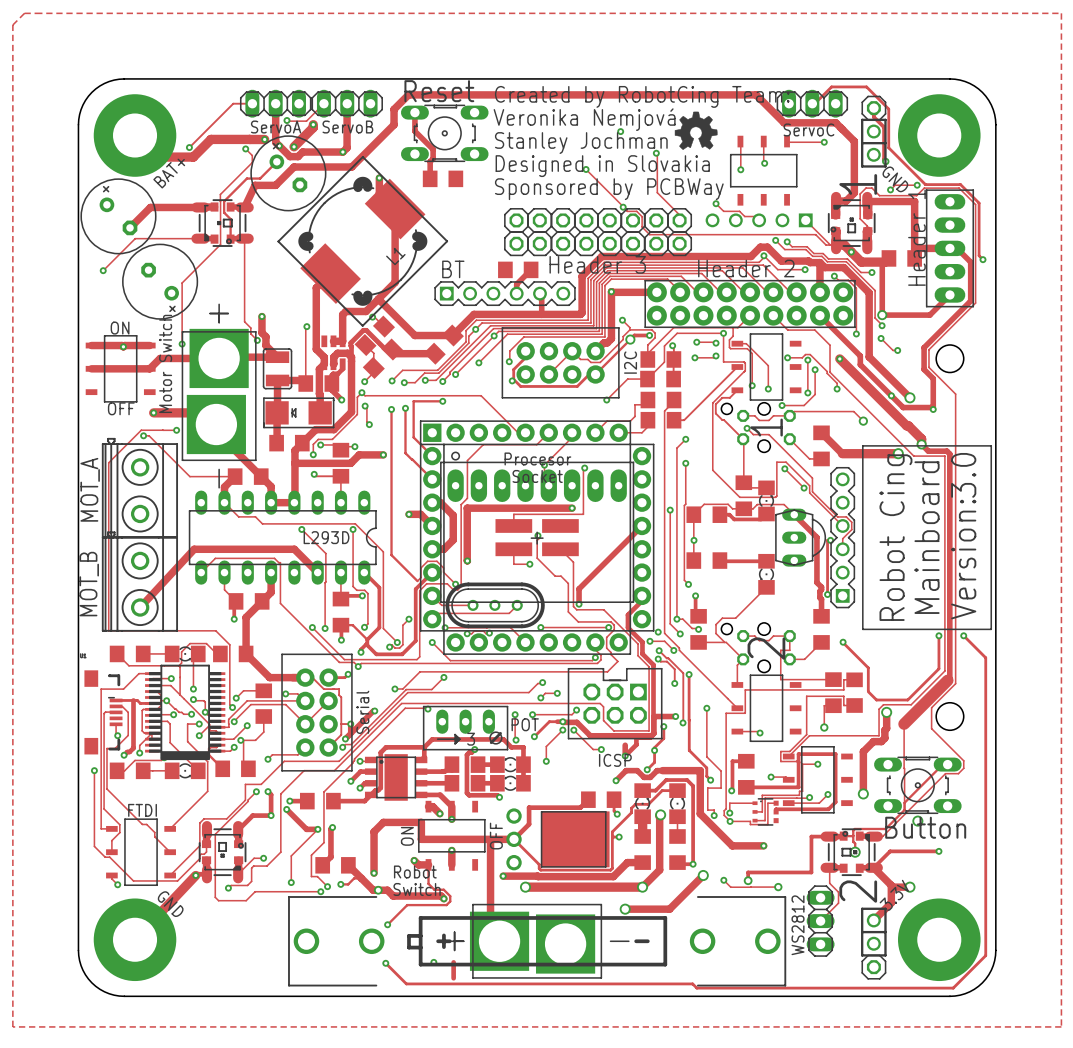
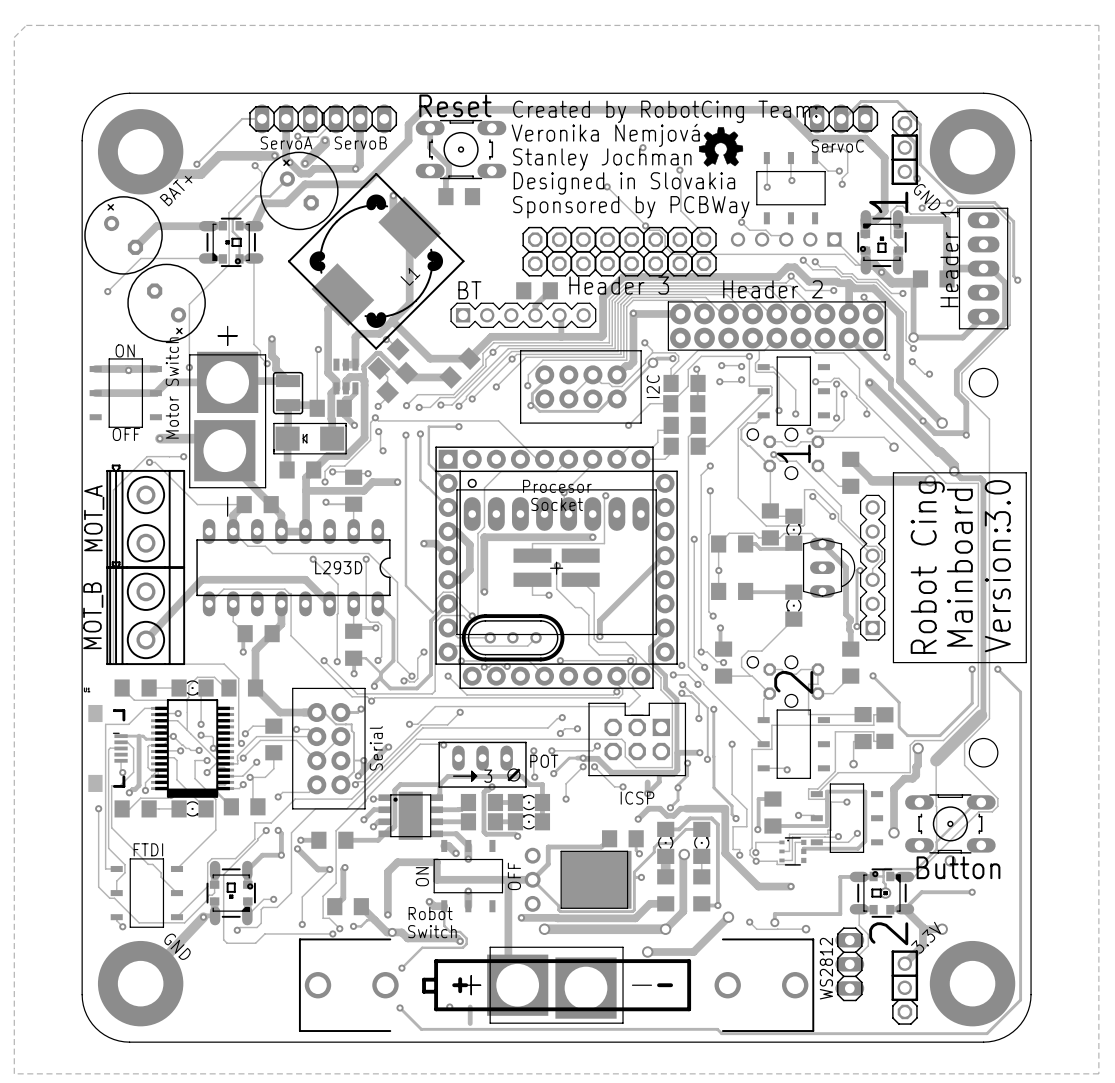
track: none -> (829, 149) (844, 149) (847, 152) (847, 172) (842, 178) (842, 184)
via: none -> (829, 149)
track: (787, 142) (824, 142) -> (815, 158) (828, 171) (839, 171)
via: (824, 142) -> none
via: none -> (839, 171)
via: none -> (842, 184)

